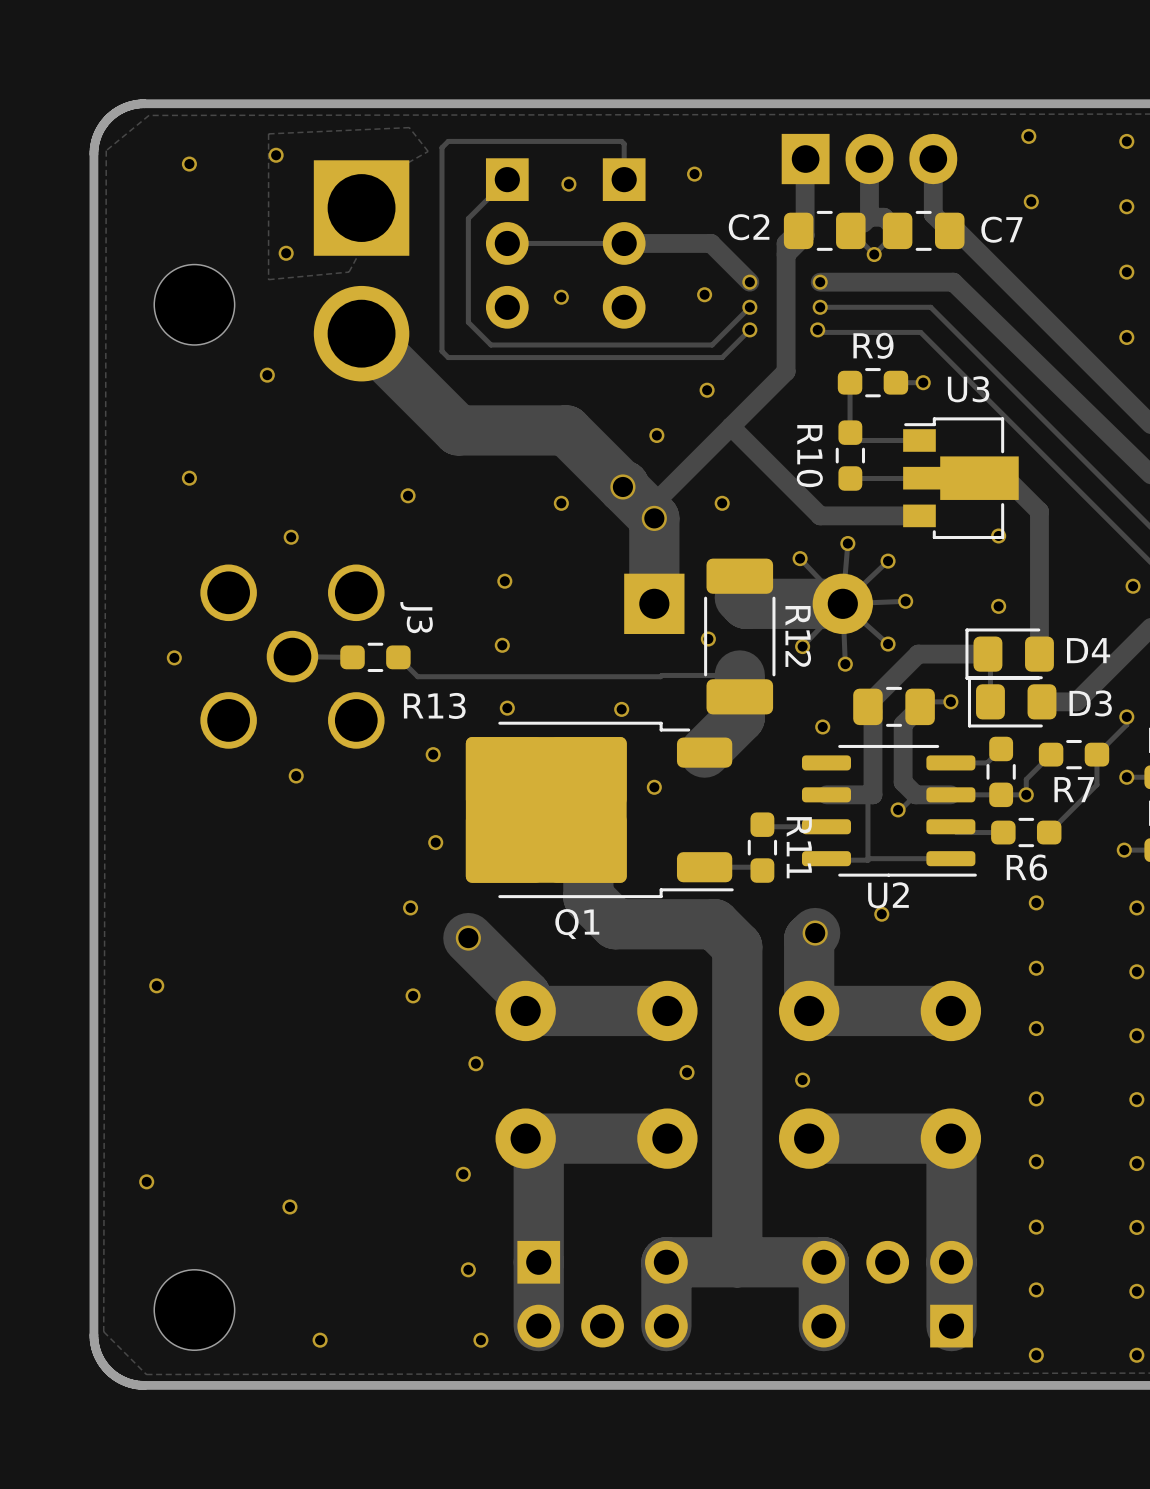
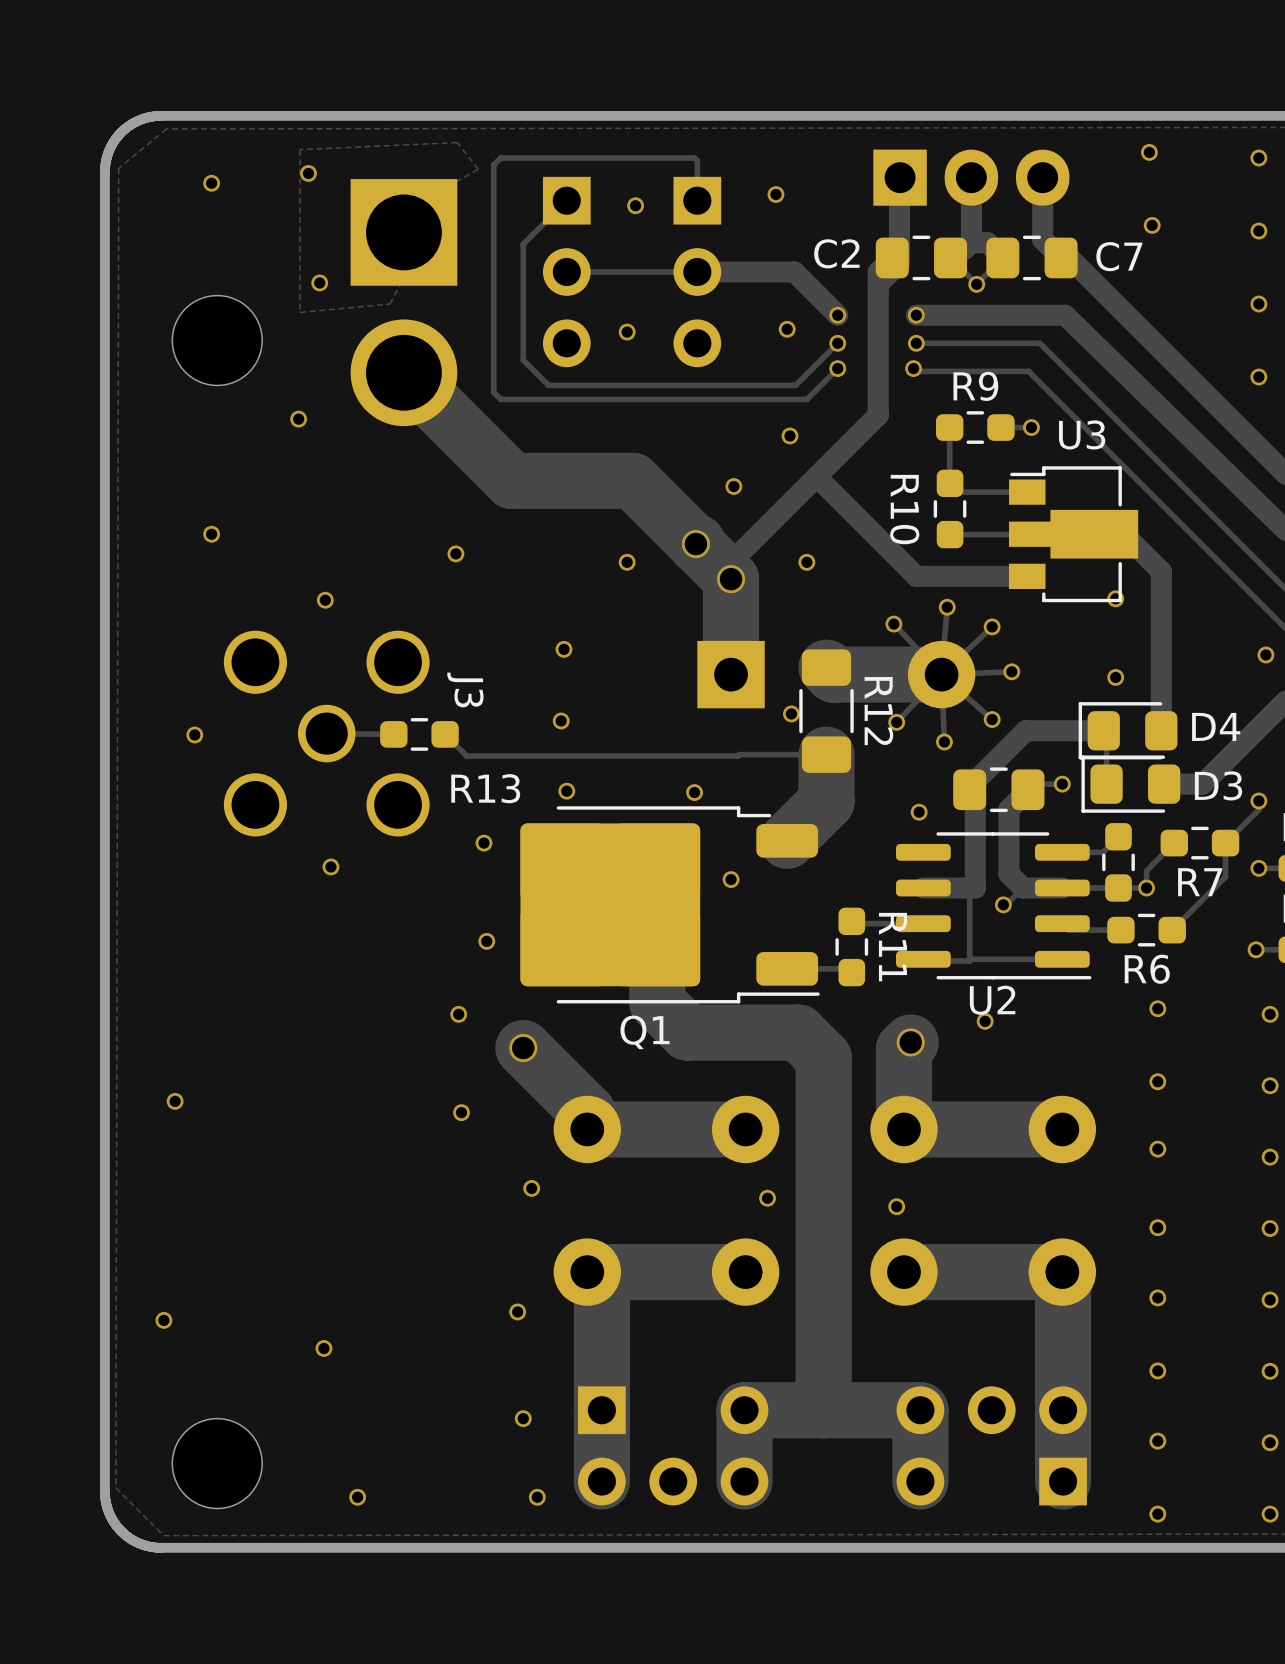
R12 footprint: [704, 558, 776, 715] -> [799, 649, 854, 773]

